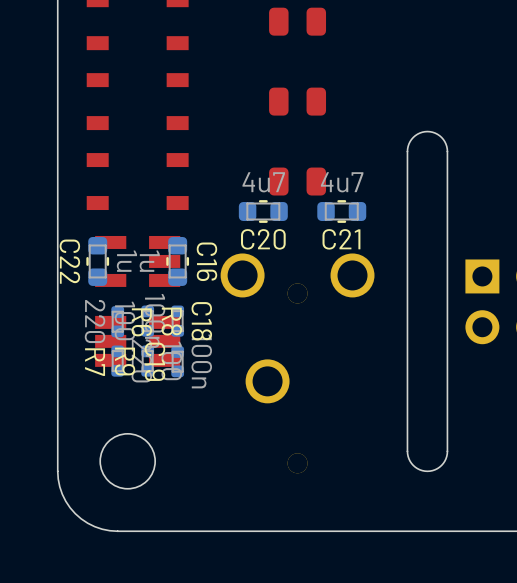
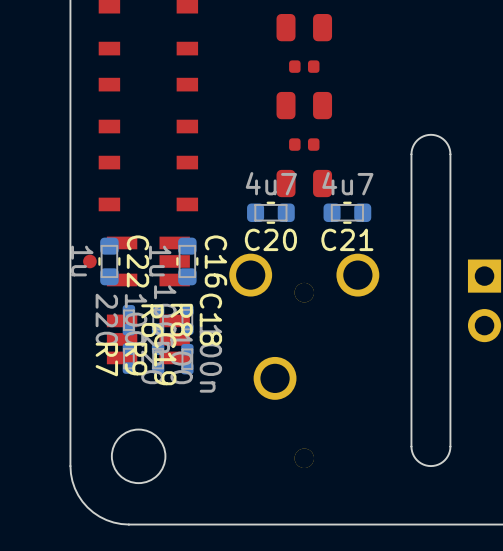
part: none -> (304, 66)
part: none -> (304, 144)
C22 name position: C22 (69, 261) -> C22 (138, 261)
part: none -> (89, 261)
C22 value position: 1u (126, 261) -> 1u (82, 261)

